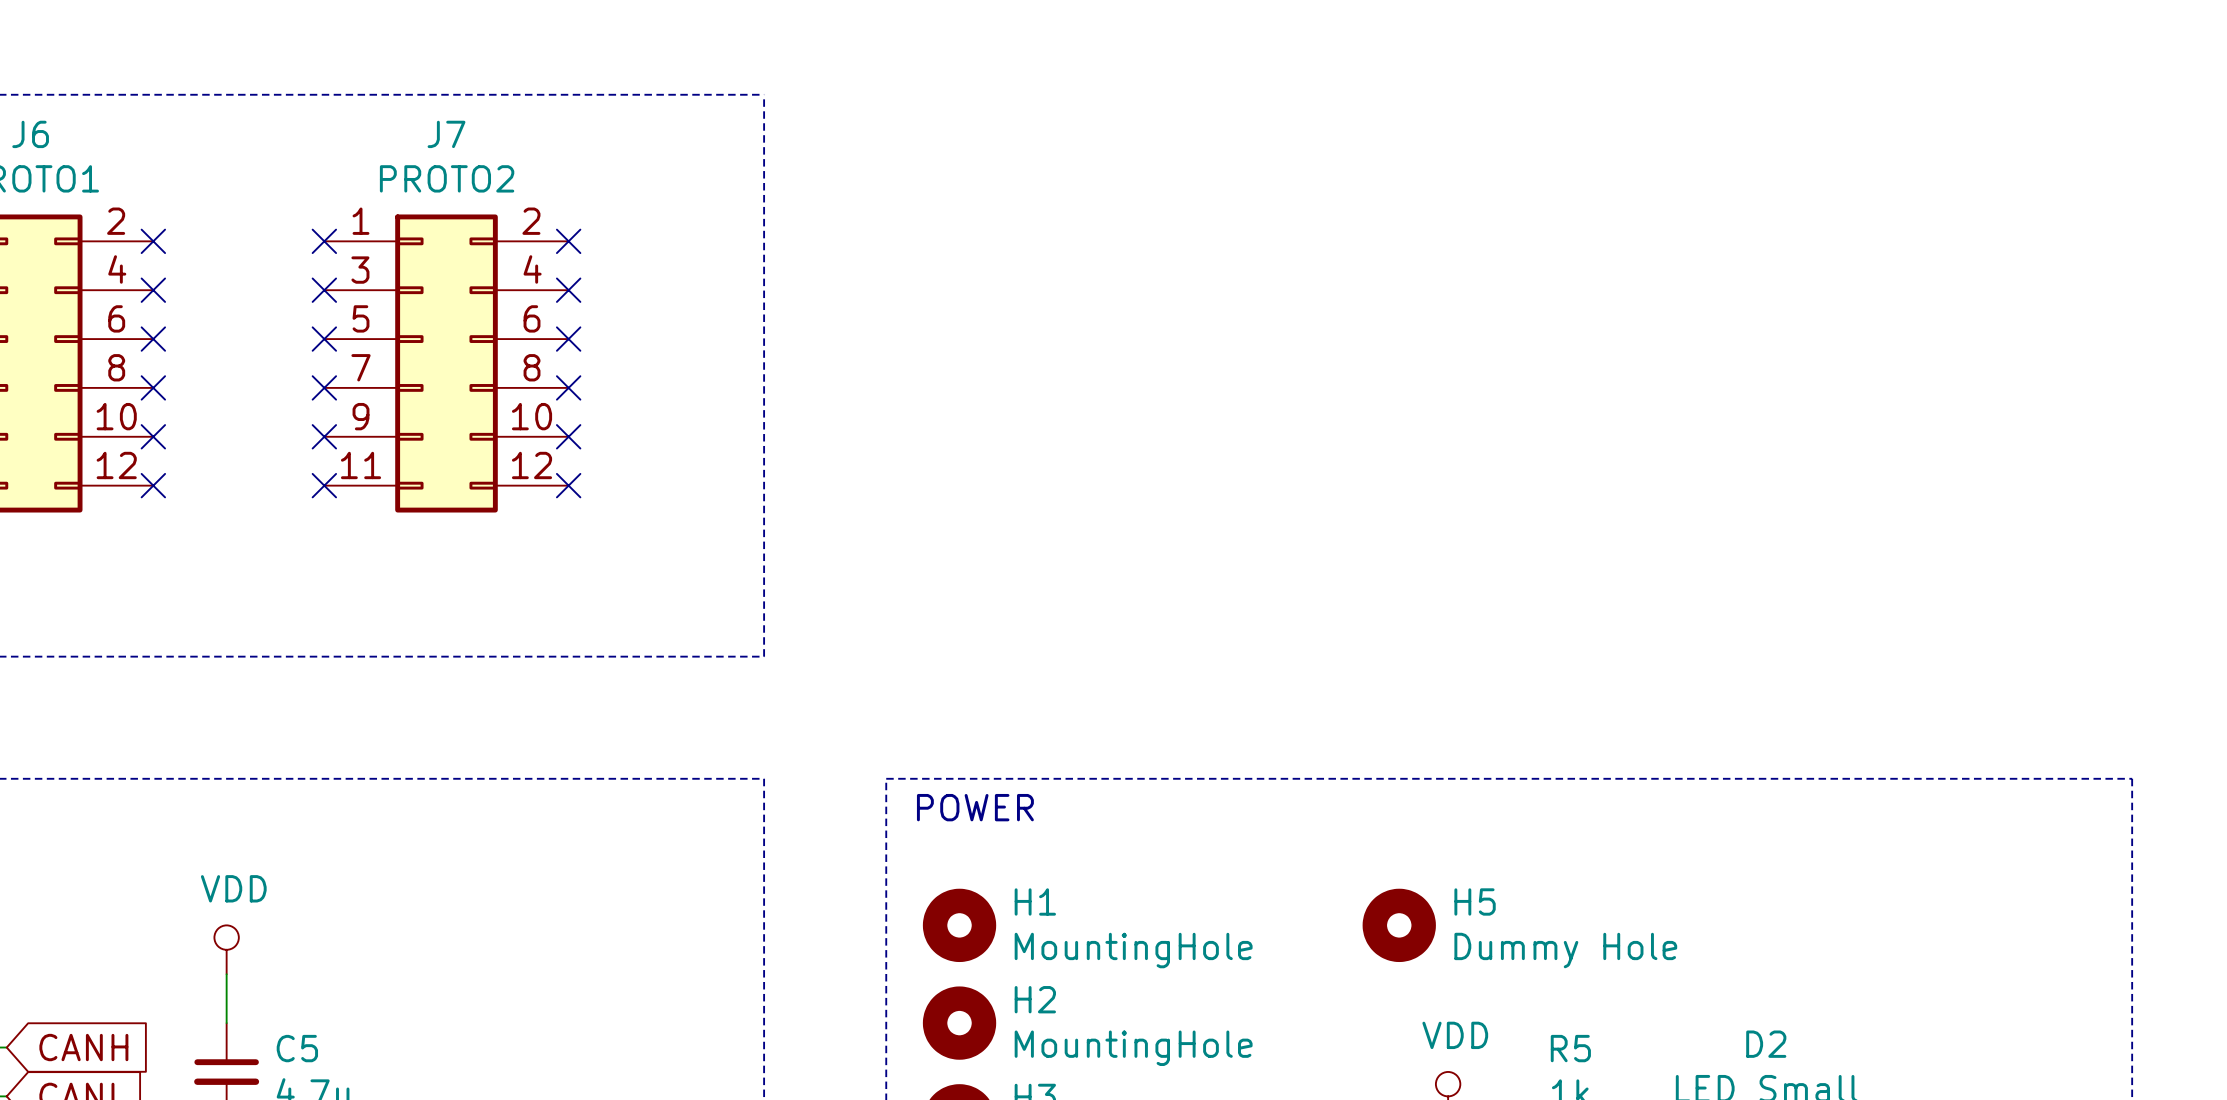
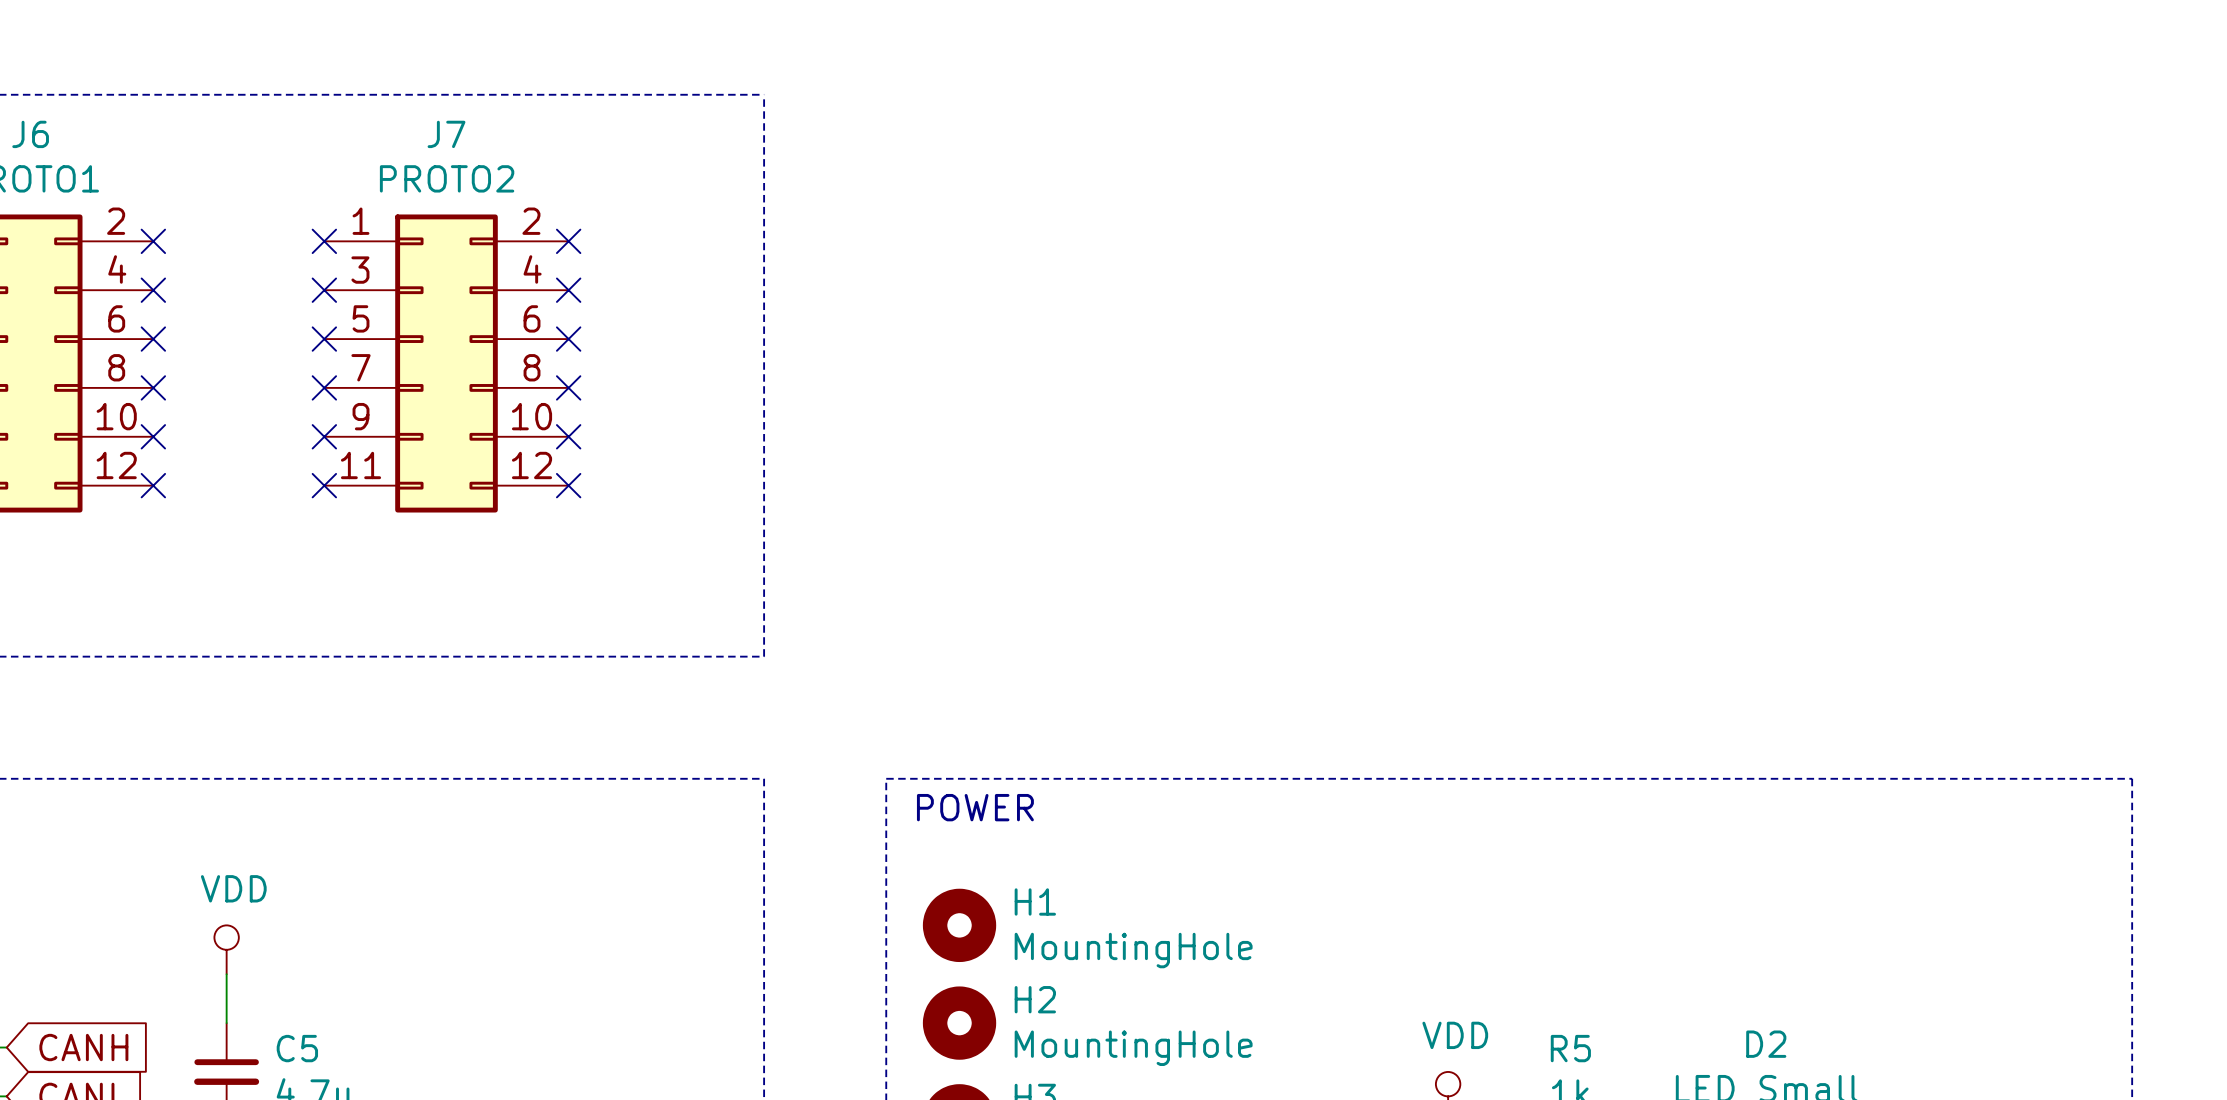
H5: Dummy Hole (1399, 925) -> none

